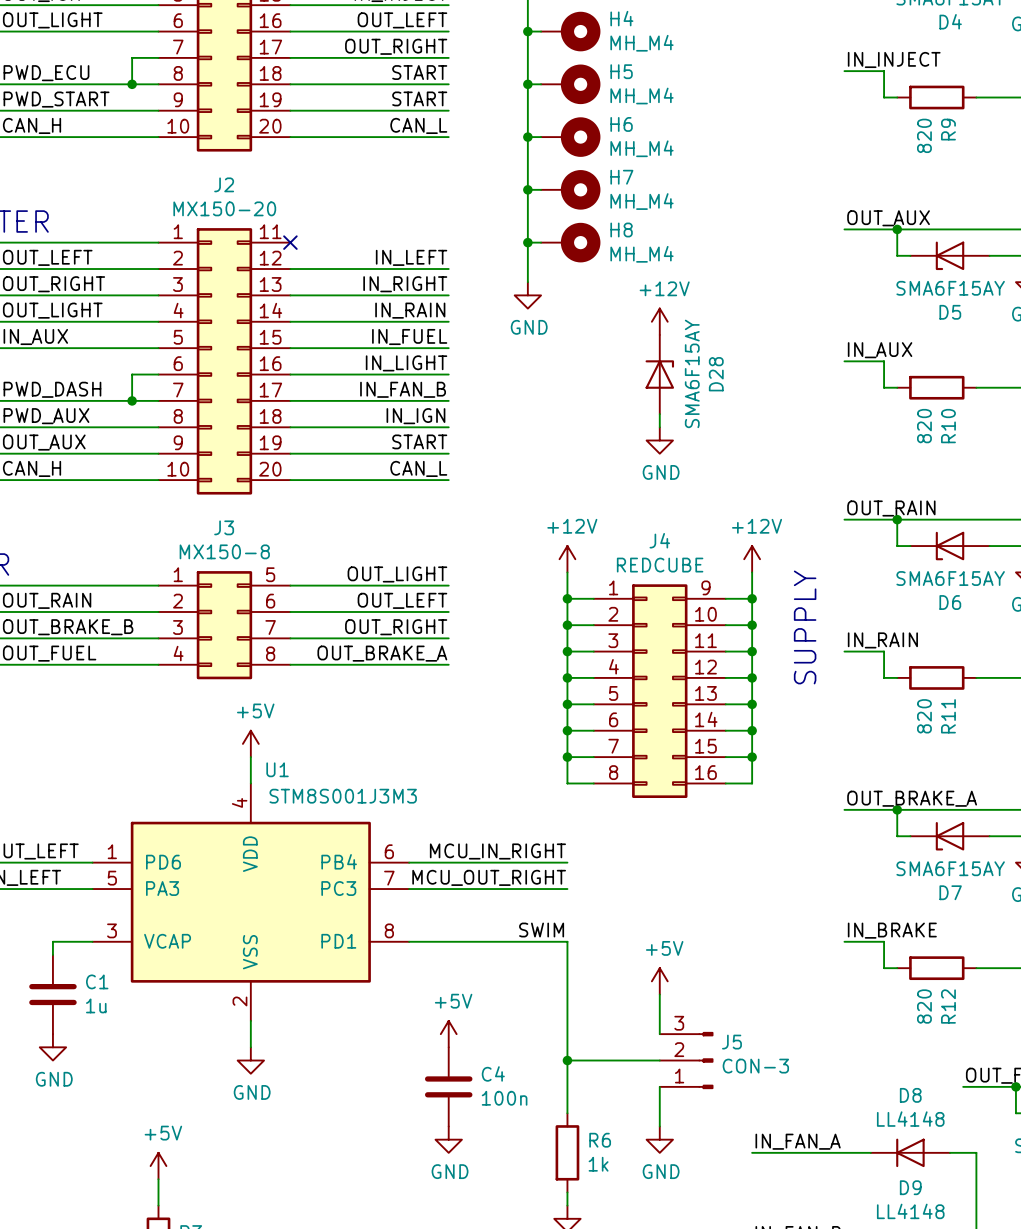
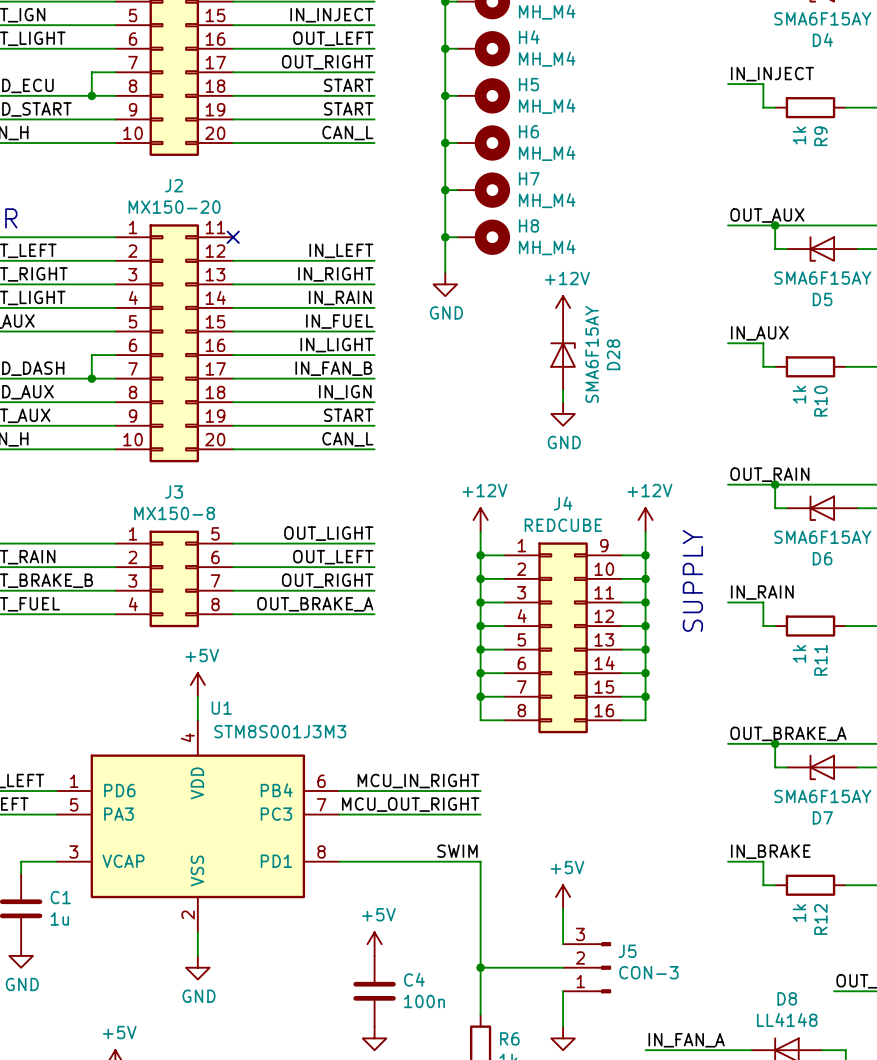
R9 value: 820 (924, 135) -> 1k (799, 135)
R10 value: 820 (924, 426) -> 1k (799, 394)
R11 value: 820 (924, 716) -> 1k (799, 653)
R12 value: 820 (924, 1006) -> 1k (799, 913)

